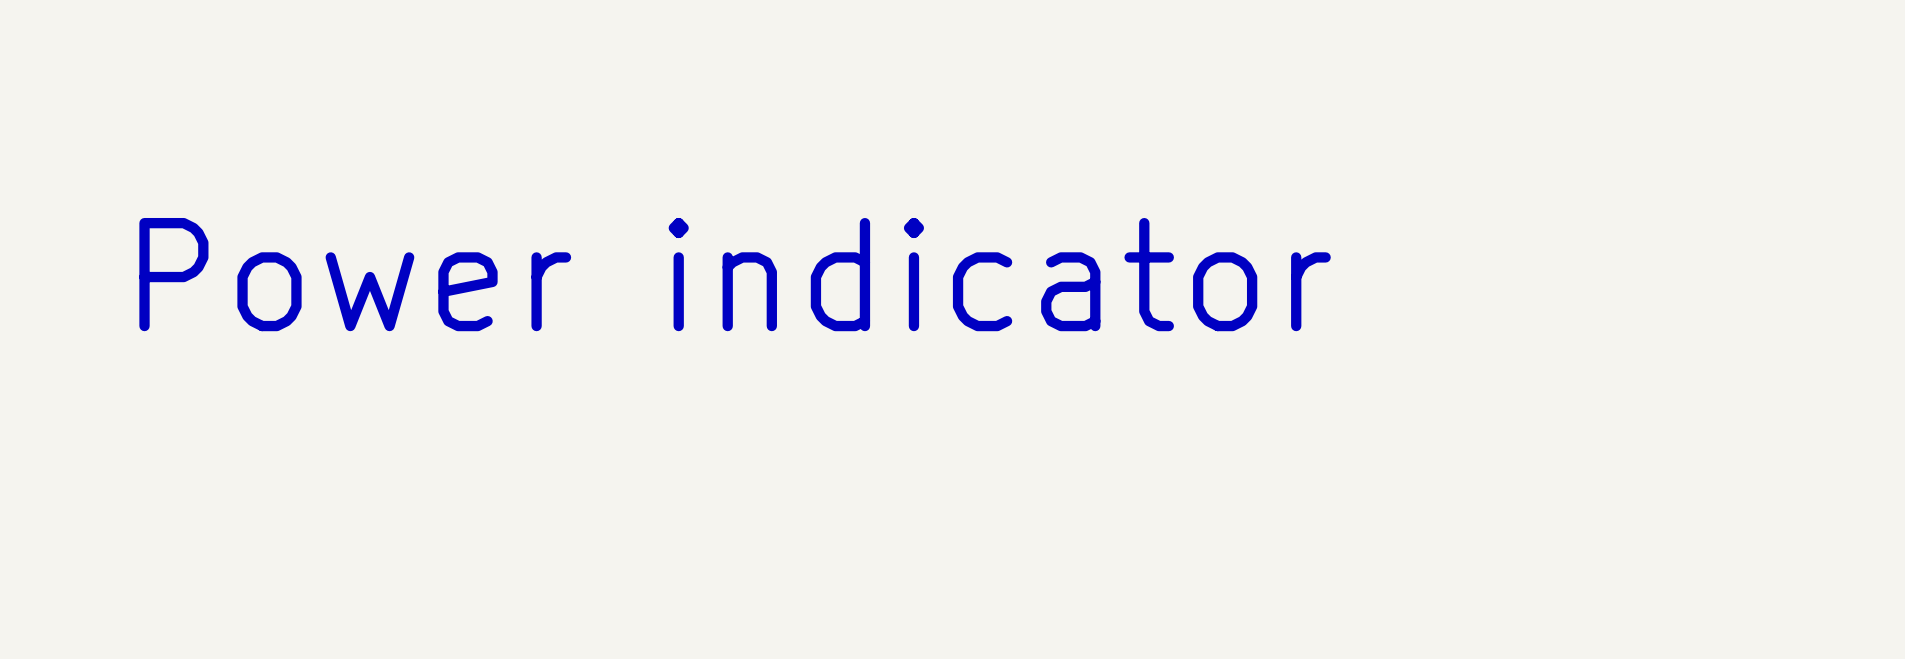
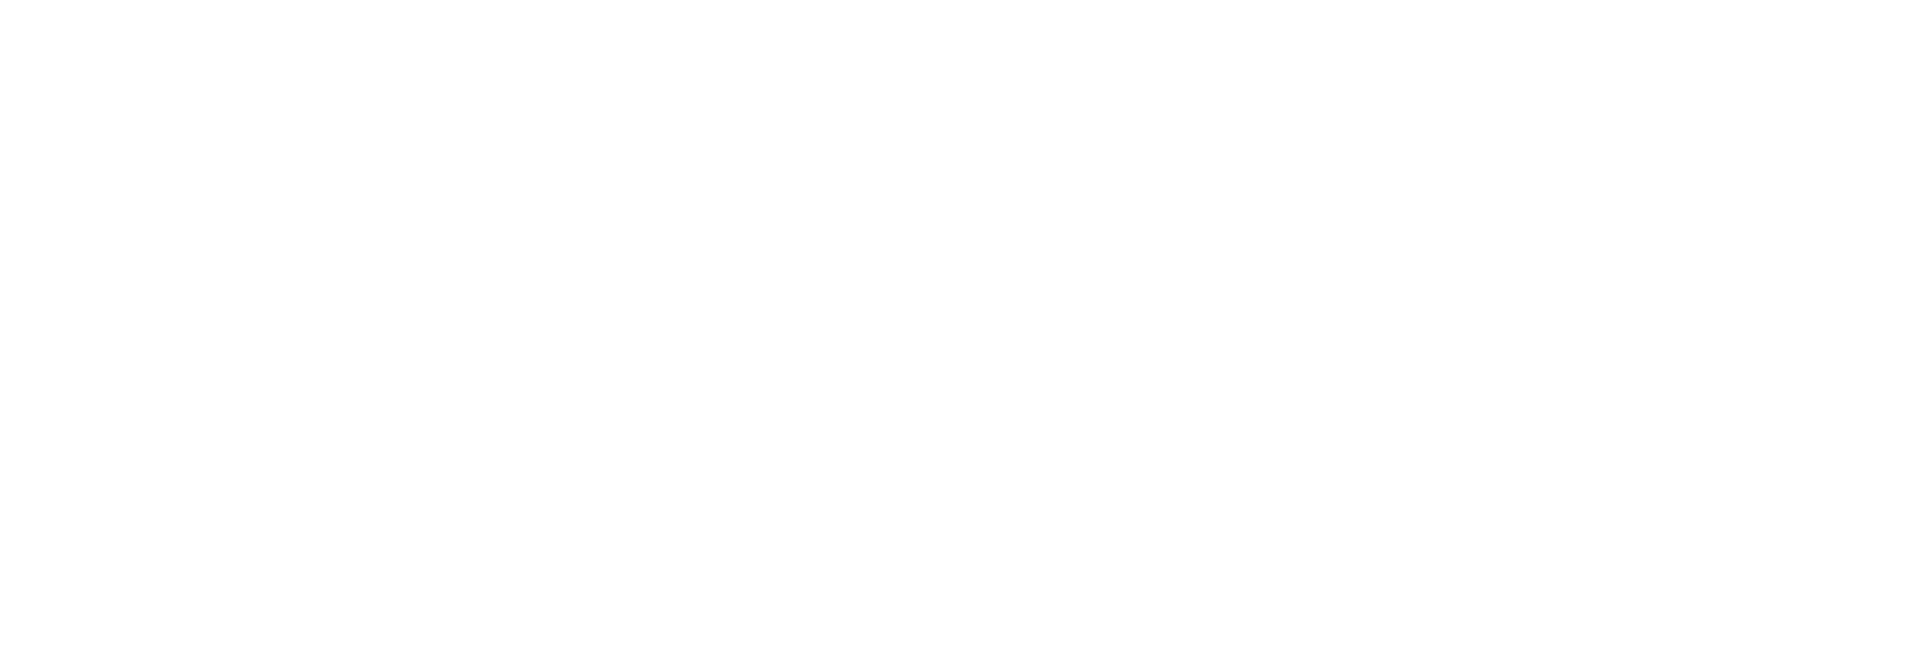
text: Power indicator (735, 274) -> none

